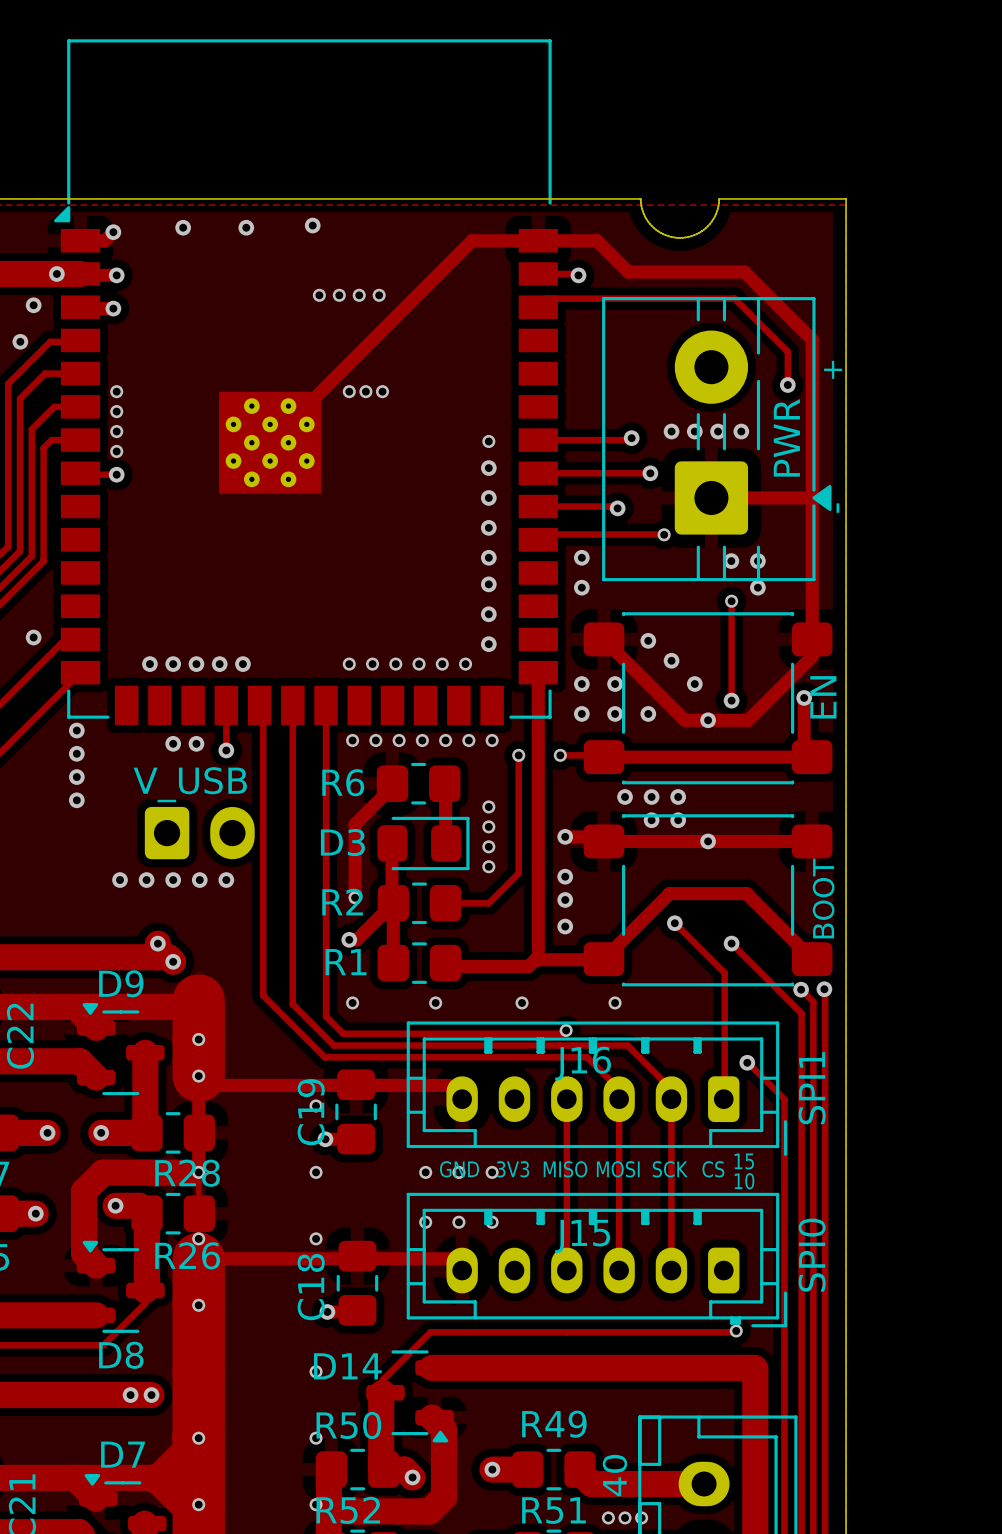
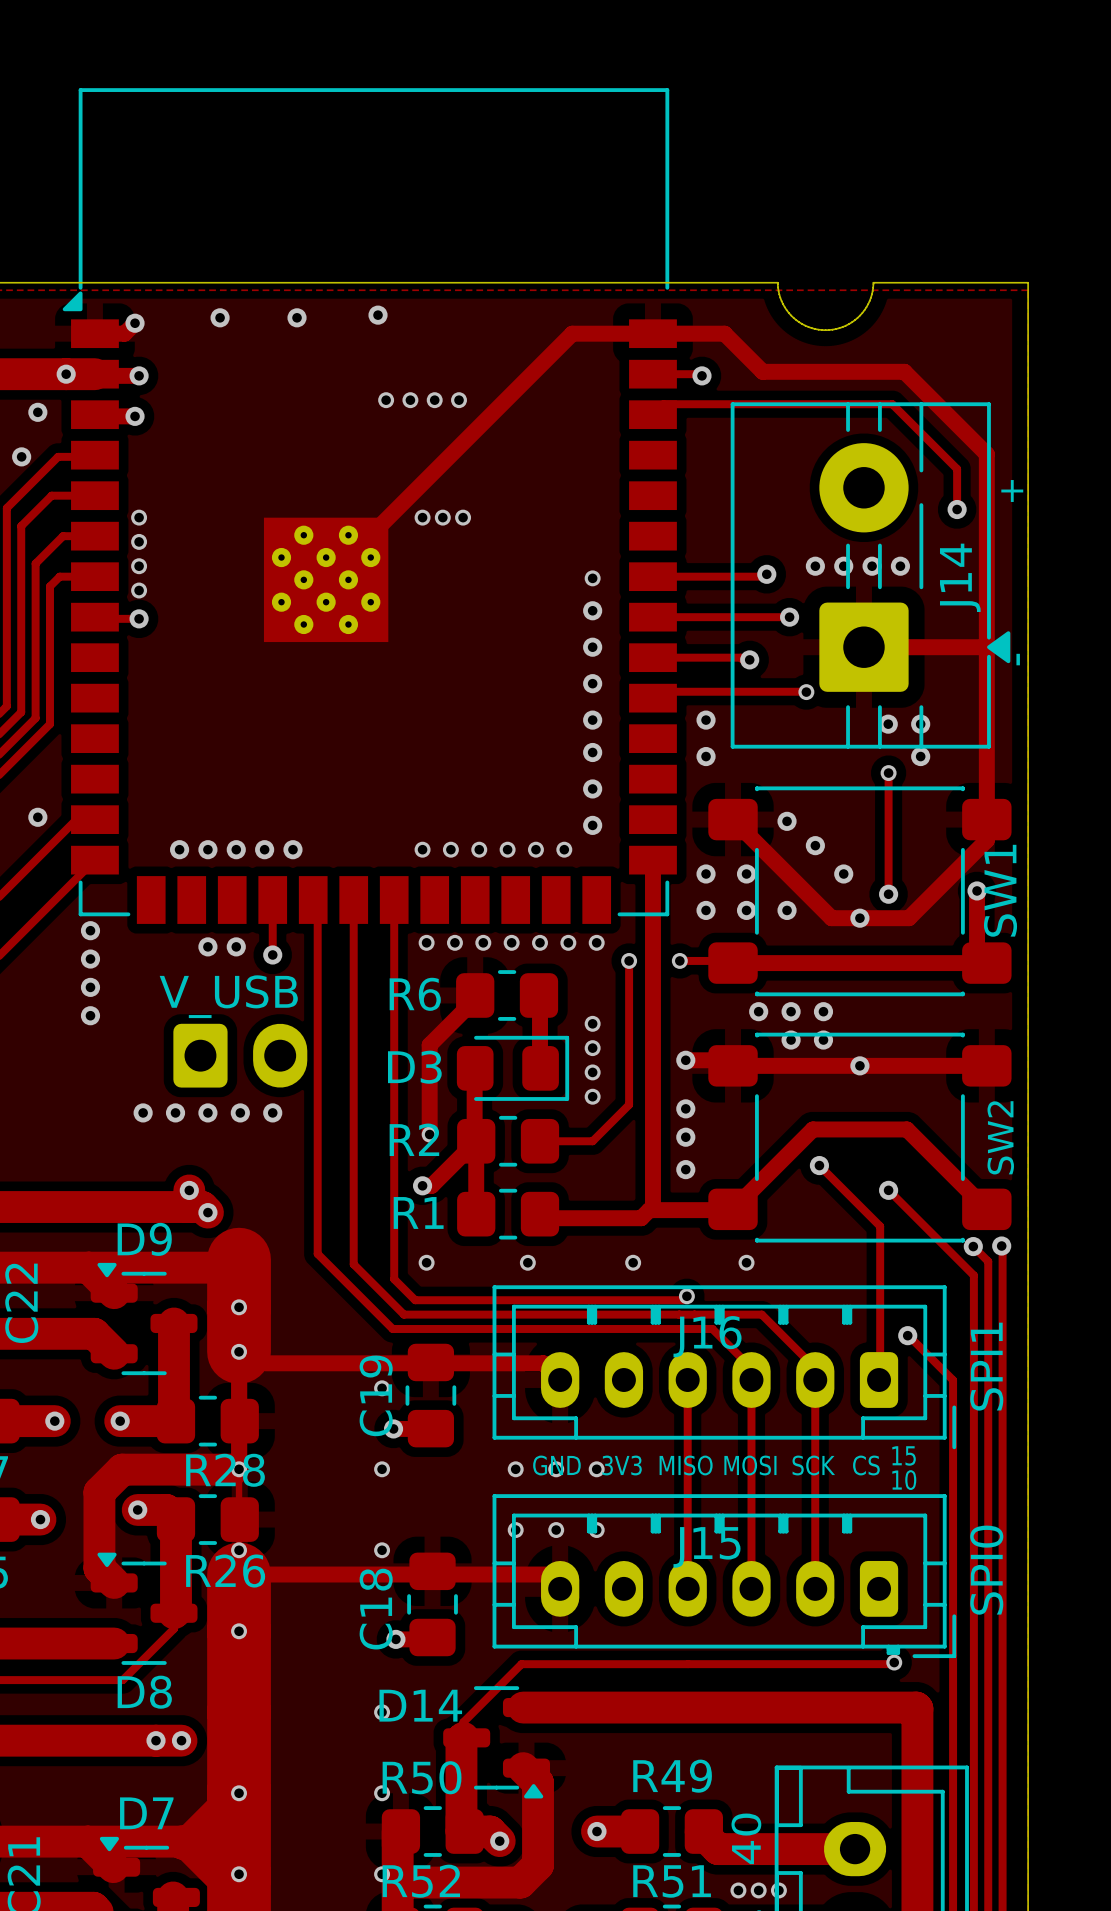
PWR name: PWR (786, 437) -> J14 (960, 577)
EN name: EN (823, 697) -> SW1 (1000, 890)
BOOT name: BOOT (823, 898) -> SW2 (1000, 1137)

